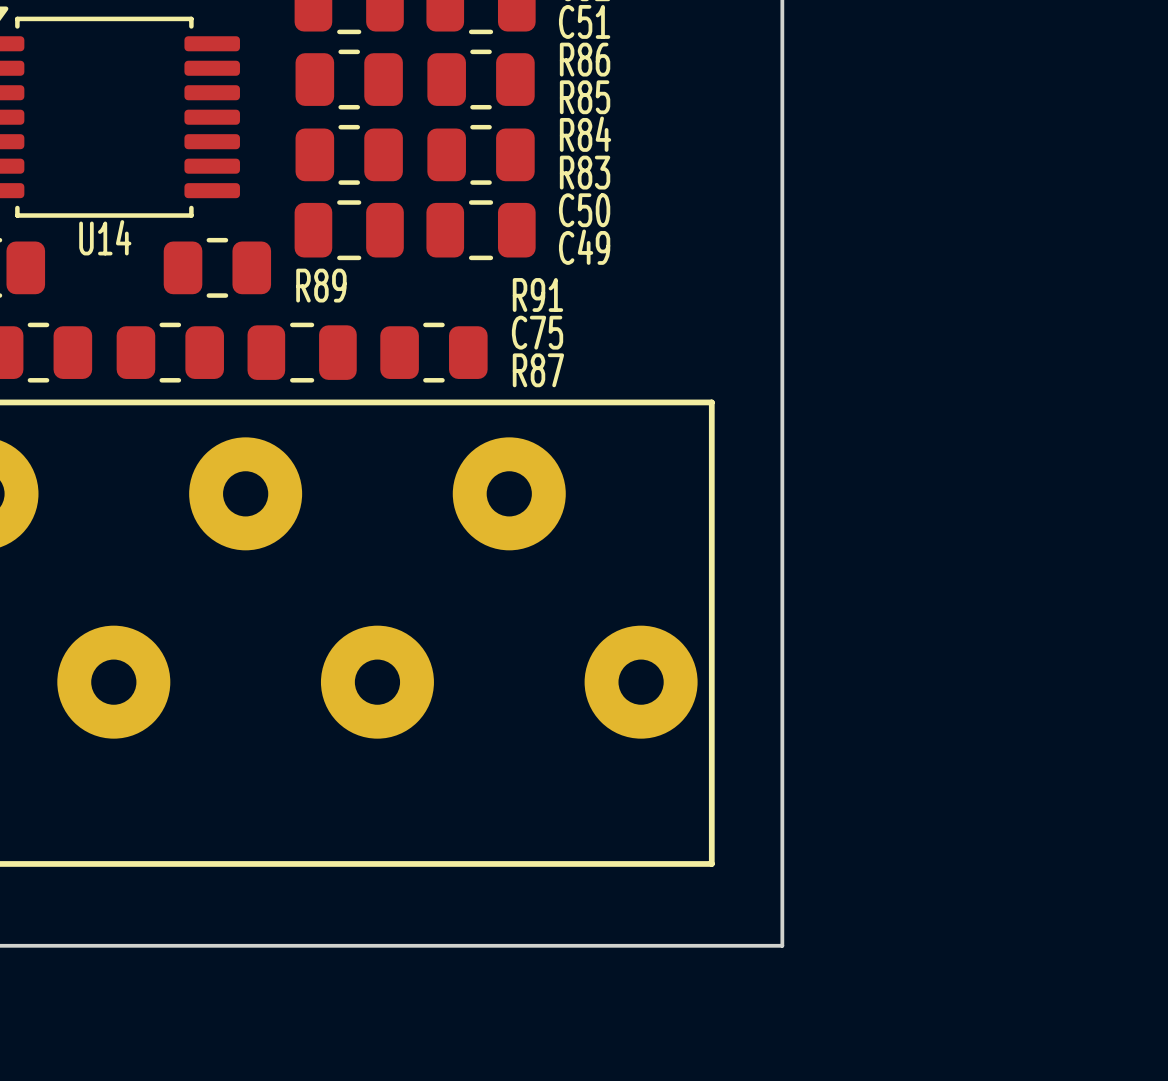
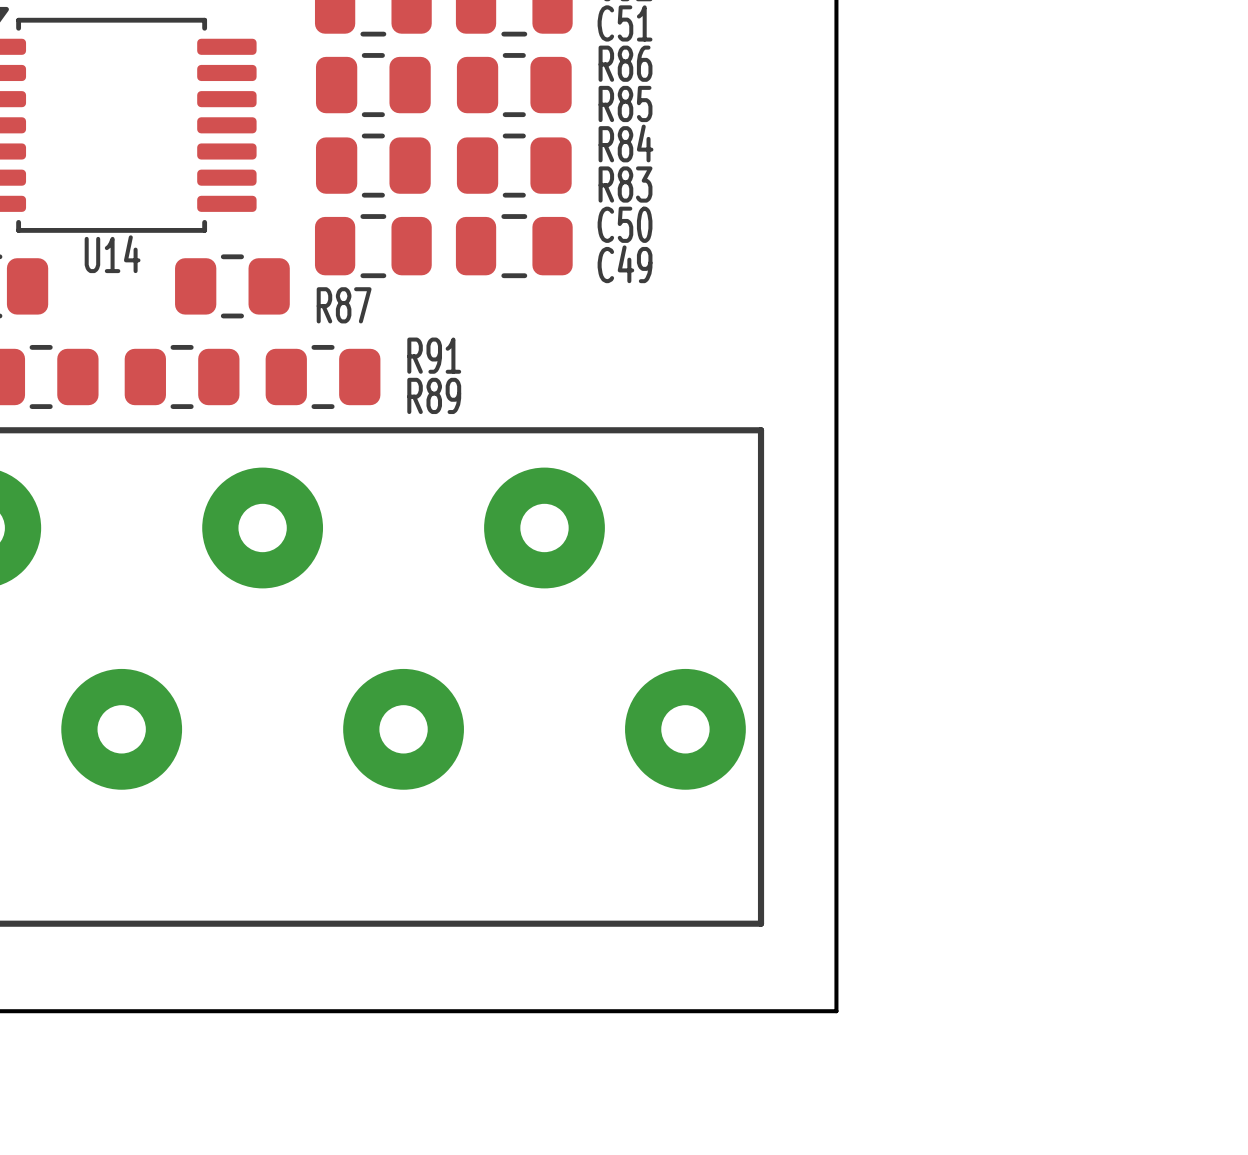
R89 name: R89 (321, 285) -> R87 (344, 305)
R91 name position: R91 (537, 294) -> R91 (434, 355)
C75: (302, 352) -> none
R89: none -> (323, 376)
R87: (433, 352) -> none

